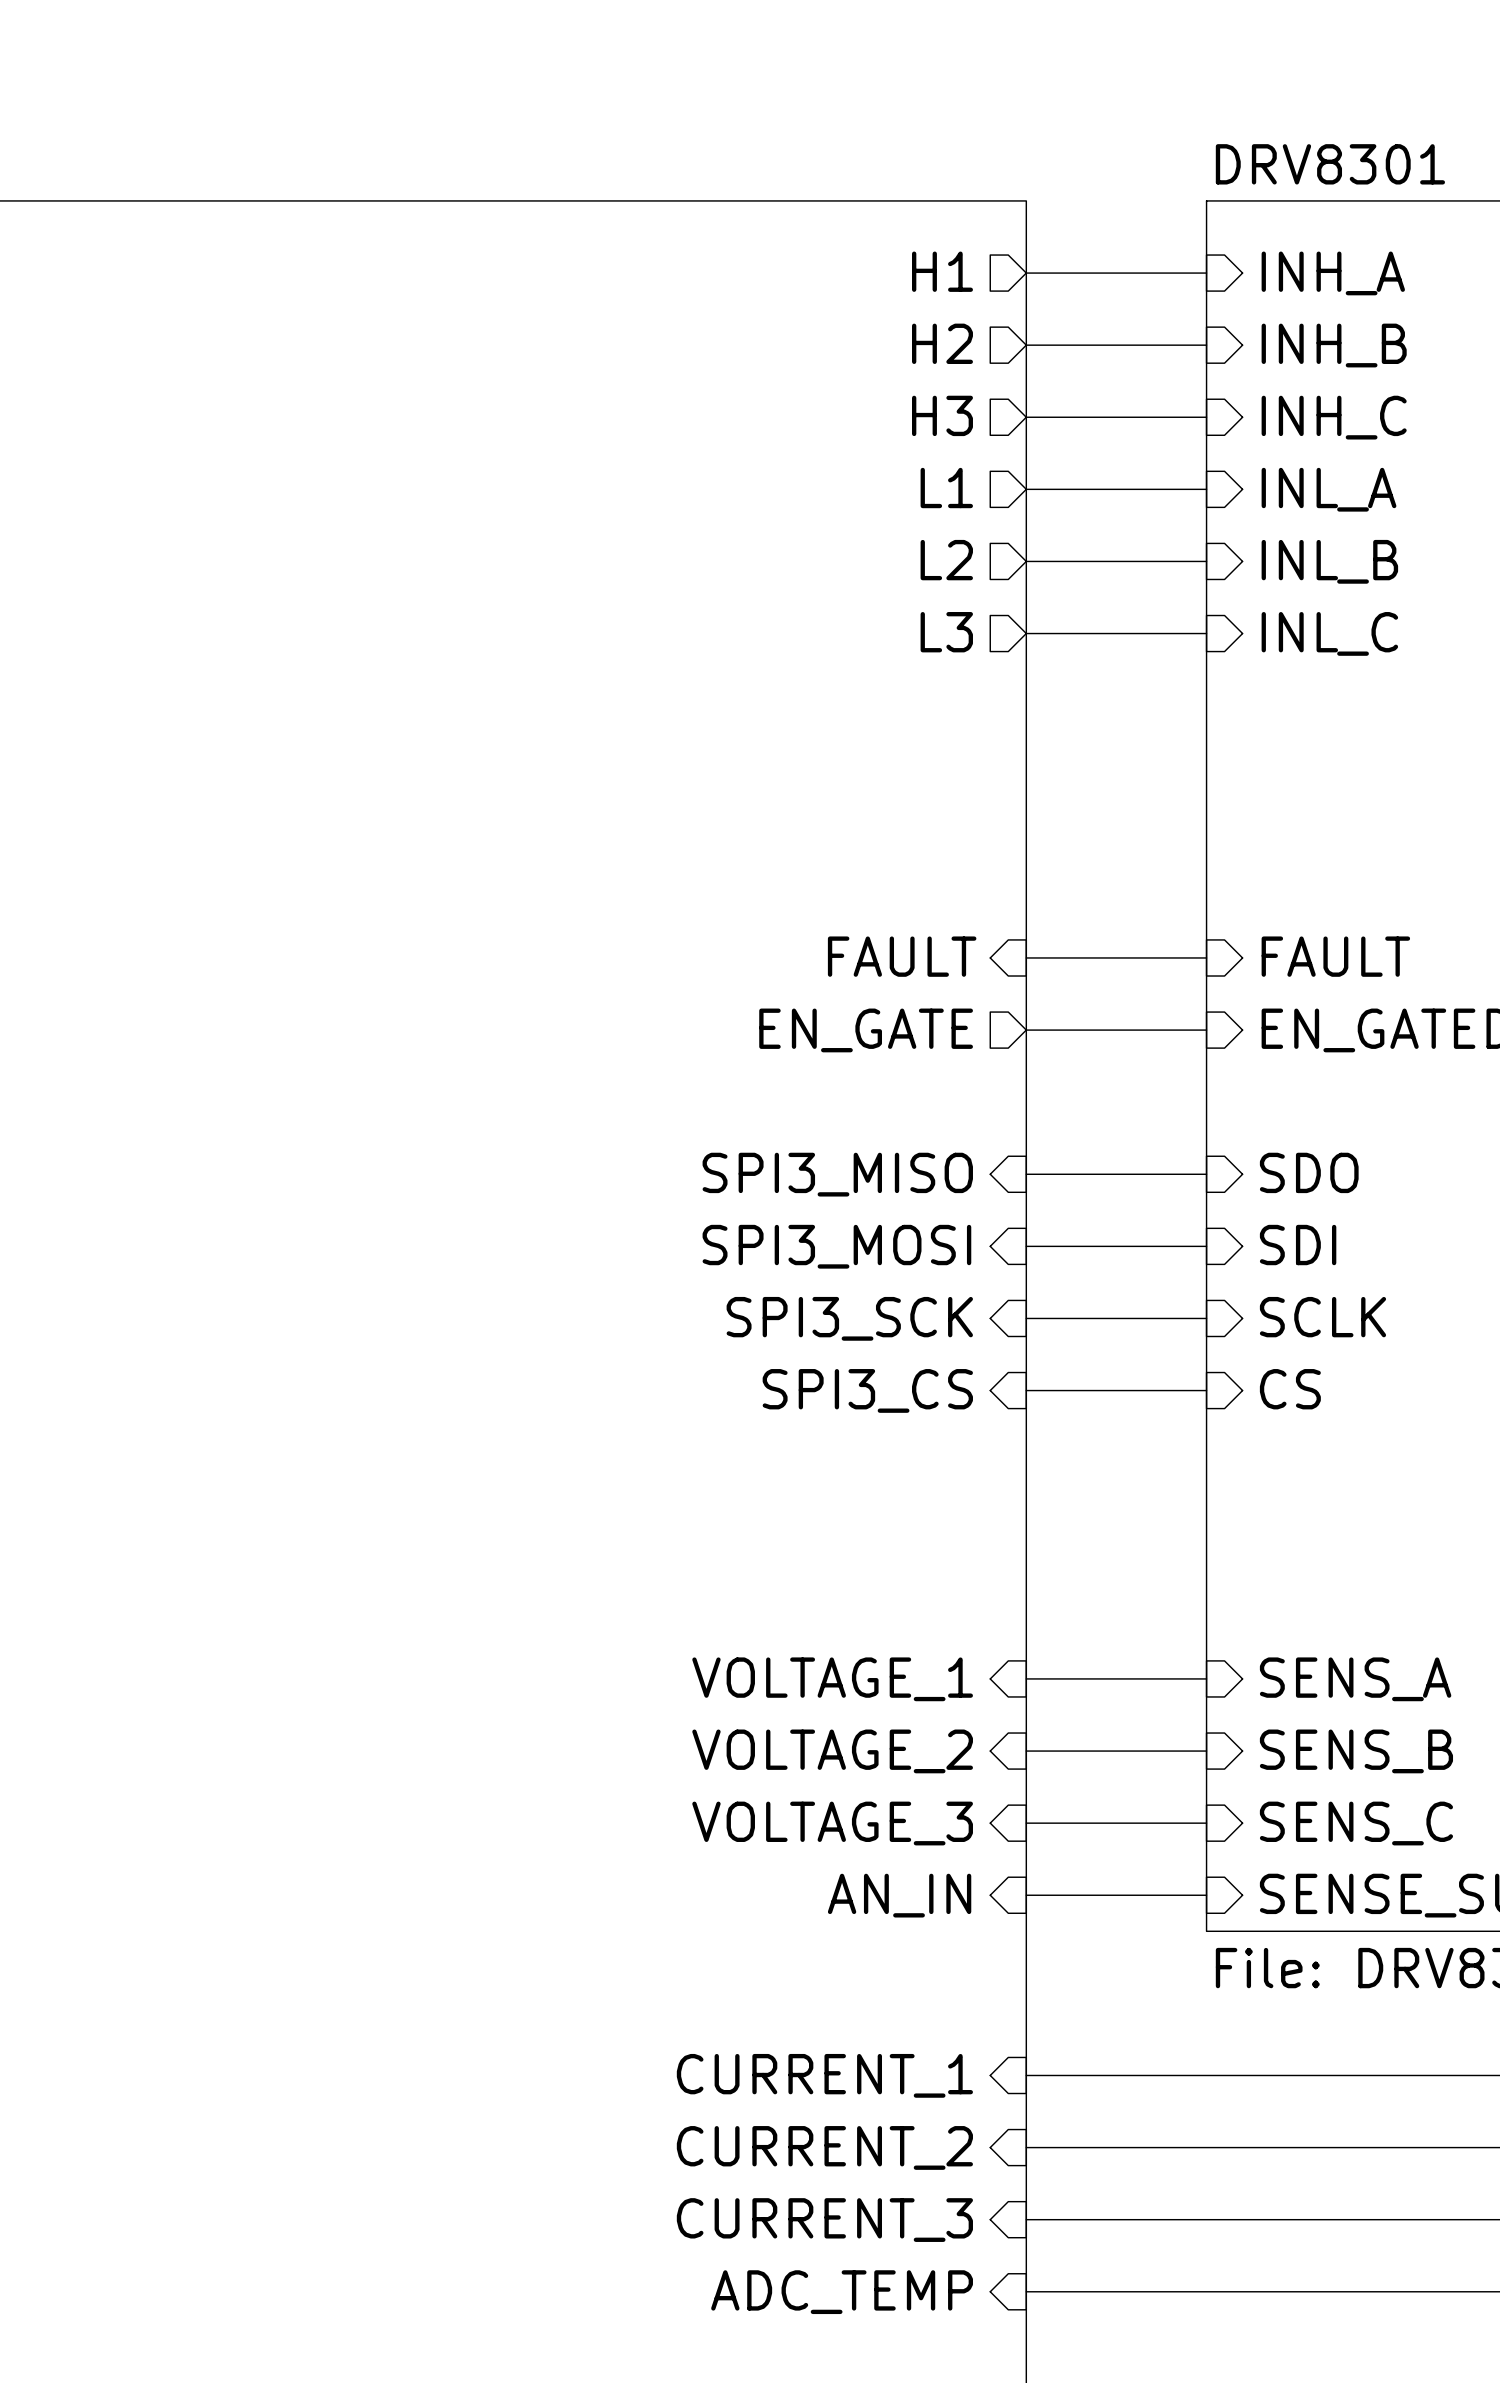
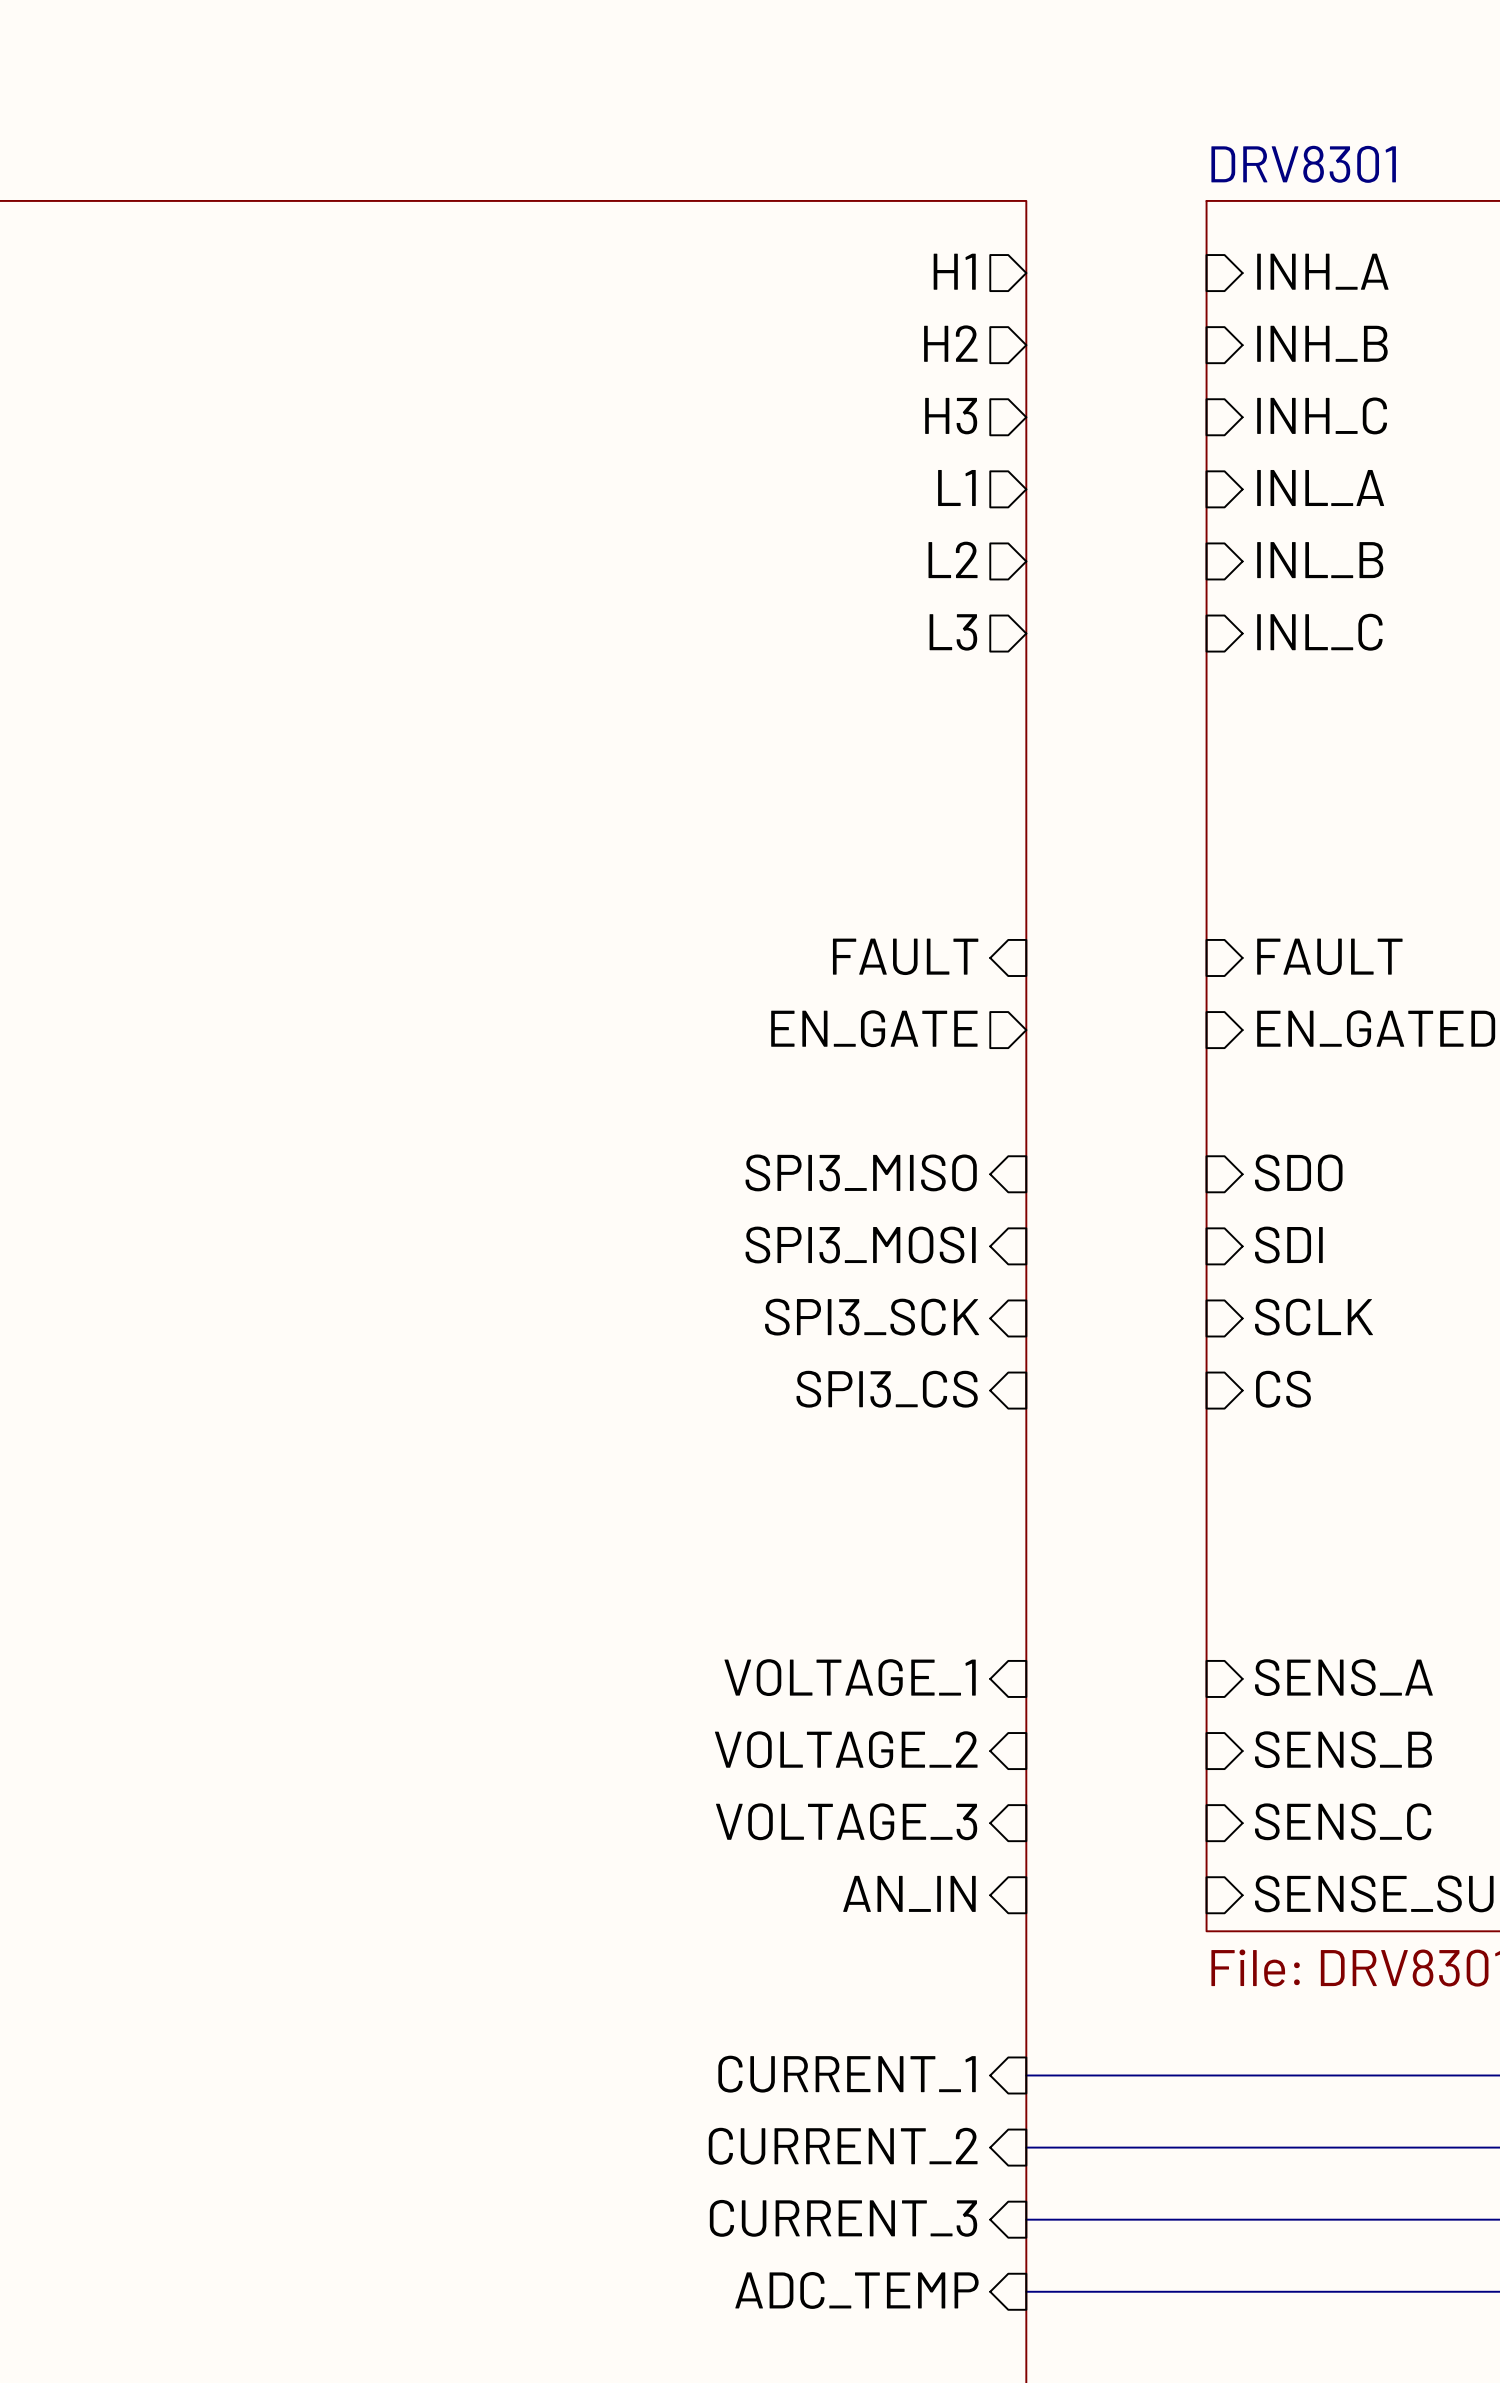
wire: (1026, 273) (1206, 273) -> none
wire: (1026, 345) (1206, 345) -> none
wire: (1026, 417) (1206, 417) -> none
wire: (1026, 489) (1206, 489) -> none
wire: (1026, 561) (1206, 561) -> none
wire: (1026, 633) (1206, 633) -> none
wire: (1026, 957) (1206, 957) -> none
wire: (1026, 1030) (1206, 1030) -> none
wire: (1026, 1174) (1206, 1174) -> none
wire: (1026, 1246) (1206, 1246) -> none
wire: (1026, 1318) (1206, 1318) -> none
wire: (1026, 1390) (1206, 1390) -> none
wire: (1026, 1678) (1206, 1678) -> none
wire: (1026, 1751) (1206, 1751) -> none
wire: (1026, 1823) (1206, 1823) -> none
wire: (1026, 1895) (1206, 1895) -> none

